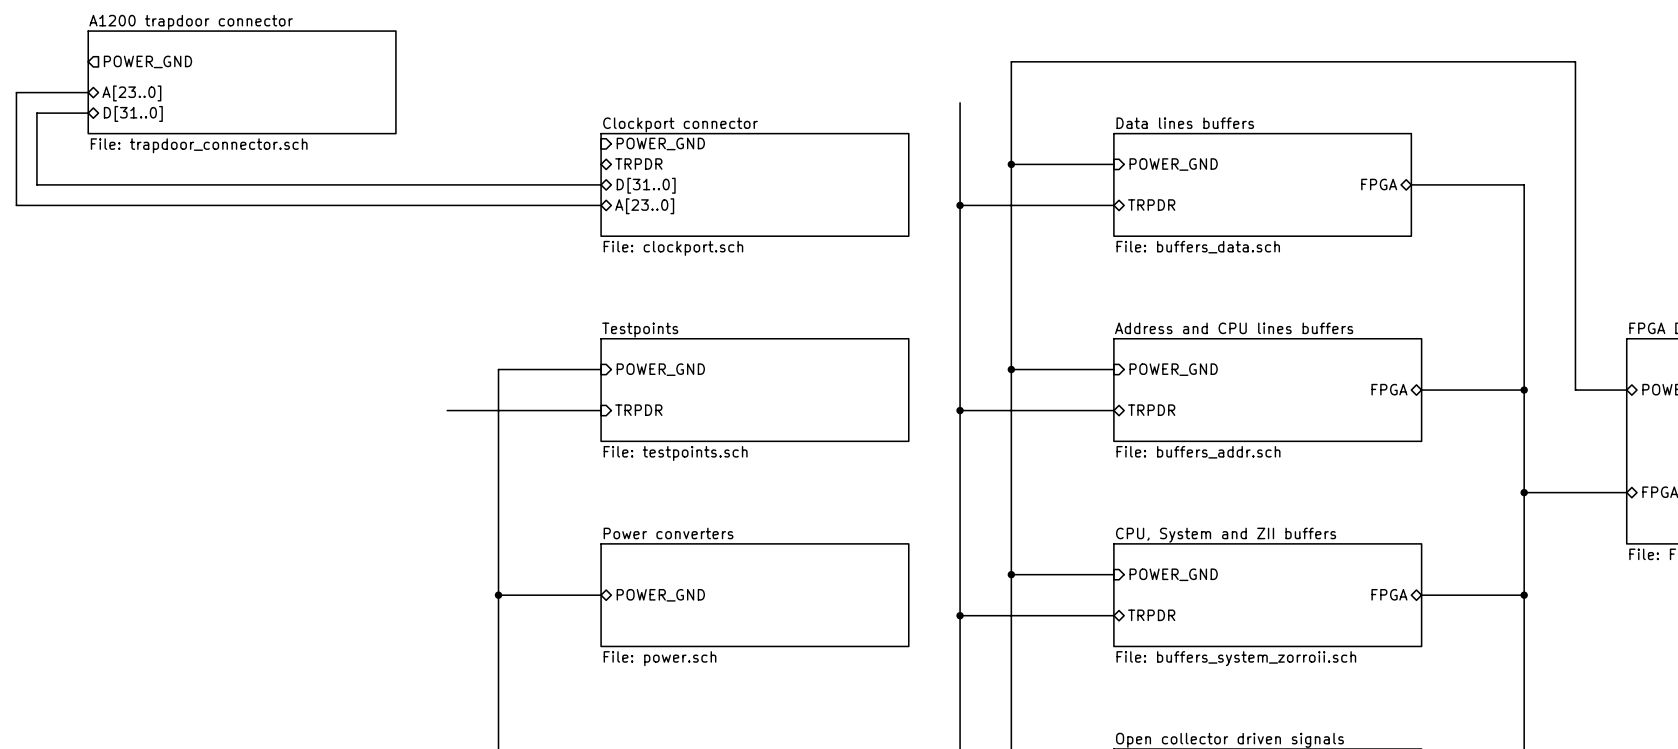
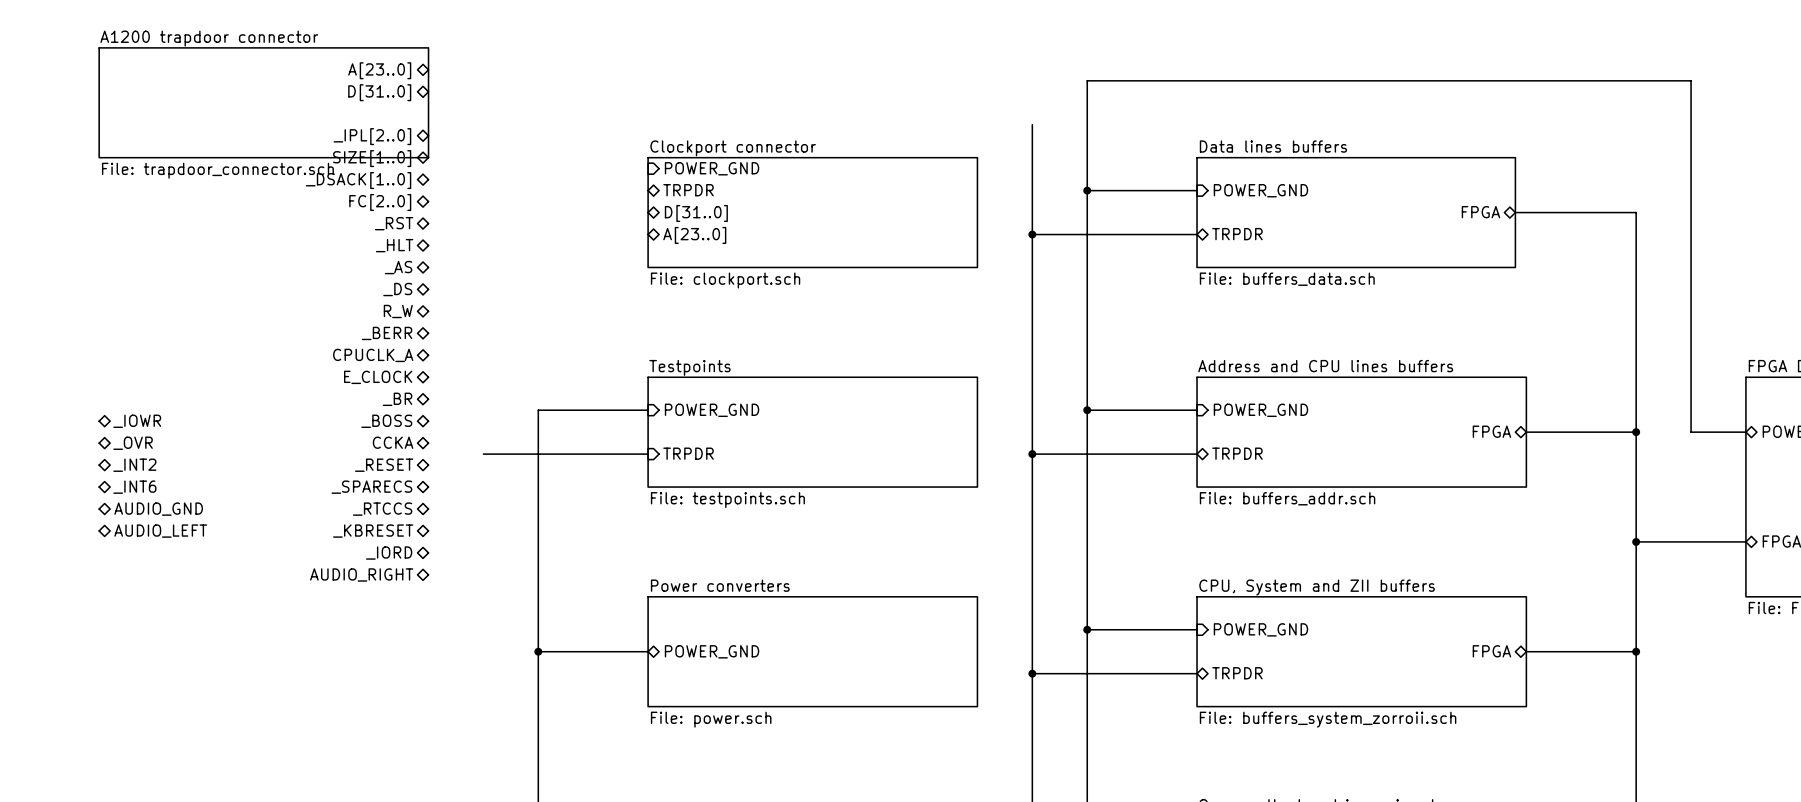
sheet pin: none -> A[23..0] (379, 70)
sheet pin: POWER_GND (147, 61) -> none
sheet pin: none -> D[31..0] (379, 92)
bus: (88, 92) (16, 92) (16, 205) (601, 205) -> none
sheet pin: A[23..0] (131, 93) -> none
bus: (88, 113) (36, 113) (36, 184) (601, 184) -> none
sheet pin: D[31..0] (133, 113) -> none
sheet pin: none -> _IPL[2..0] (372, 136)
sheet pin: none -> SIZE[1..0] (372, 158)
sheet pin: none -> _DSACK[1..0] (358, 180)
sheet pin: none -> FC[2..0] (380, 202)
sheet pin: none -> _RST (394, 223)
sheet pin: none -> _HLT (394, 245)
sheet pin: none -> _AS (398, 267)
sheet pin: none -> _DS (397, 289)
sheet pin: none -> R_W (398, 311)
sheet pin: none -> _BERR (387, 333)
sheet pin: none -> CPUCLK_A (373, 355)
sheet pin: none -> E_CLOCK (378, 377)
sheet pin: none -> _BR (397, 399)
sheet pin: none -> _IOWR (137, 421)
sheet pin: none -> _BOSS (386, 421)
sheet pin: none -> CCKA (393, 442)
sheet pin: none -> _OVR (133, 443)
sheet pin: none -> _INT2 (134, 465)
sheet pin: none -> _RESET (384, 465)
sheet pin: none -> _INT6 (134, 487)
sheet pin: none -> _SPARECS (371, 487)
sheet pin: none -> AUDIO_GND (158, 509)
sheet pin: none -> _RTCCS (382, 509)
sheet pin: none -> AUDIO_LEFT (160, 531)
sheet pin: none -> _KBRESET (373, 531)
sheet pin: none -> _IORD (389, 553)
sheet pin: none -> AUDIO_RIGHT (361, 574)

